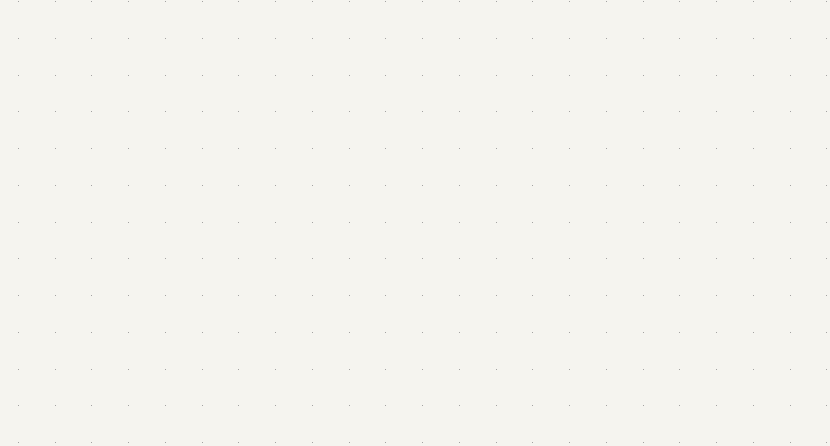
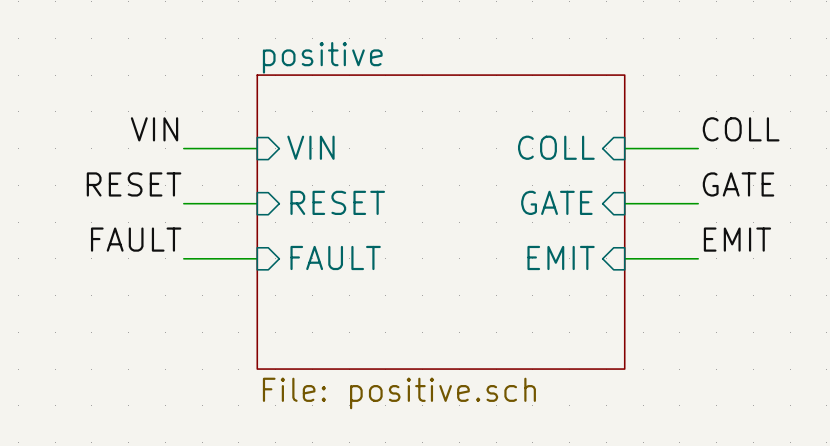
label: none -> VIN (154, 129)
label: none -> COLL (741, 129)
sheet pin: none -> VIN (310, 147)
sheet pin: none -> COLL (556, 147)
wire: none -> (183, 148) (257, 148)
wire: none -> (624, 148) (698, 148)
label: none -> RESET (134, 184)
label: none -> GATE (738, 184)
sheet pin: none -> RESET (337, 202)
sheet pin: none -> GATE (556, 202)
wire: none -> (183, 203) (257, 203)
wire: none -> (624, 203) (698, 203)
sheet positive: none -> File: positive.sch (441, 222)
label: none -> FAULT (136, 239)
label: none -> EMIT (737, 239)
sheet pin: none -> FAULT (335, 257)
sheet pin: none -> EMIT (561, 257)
wire: none -> (183, 258) (257, 258)
wire: none -> (624, 258) (698, 258)

